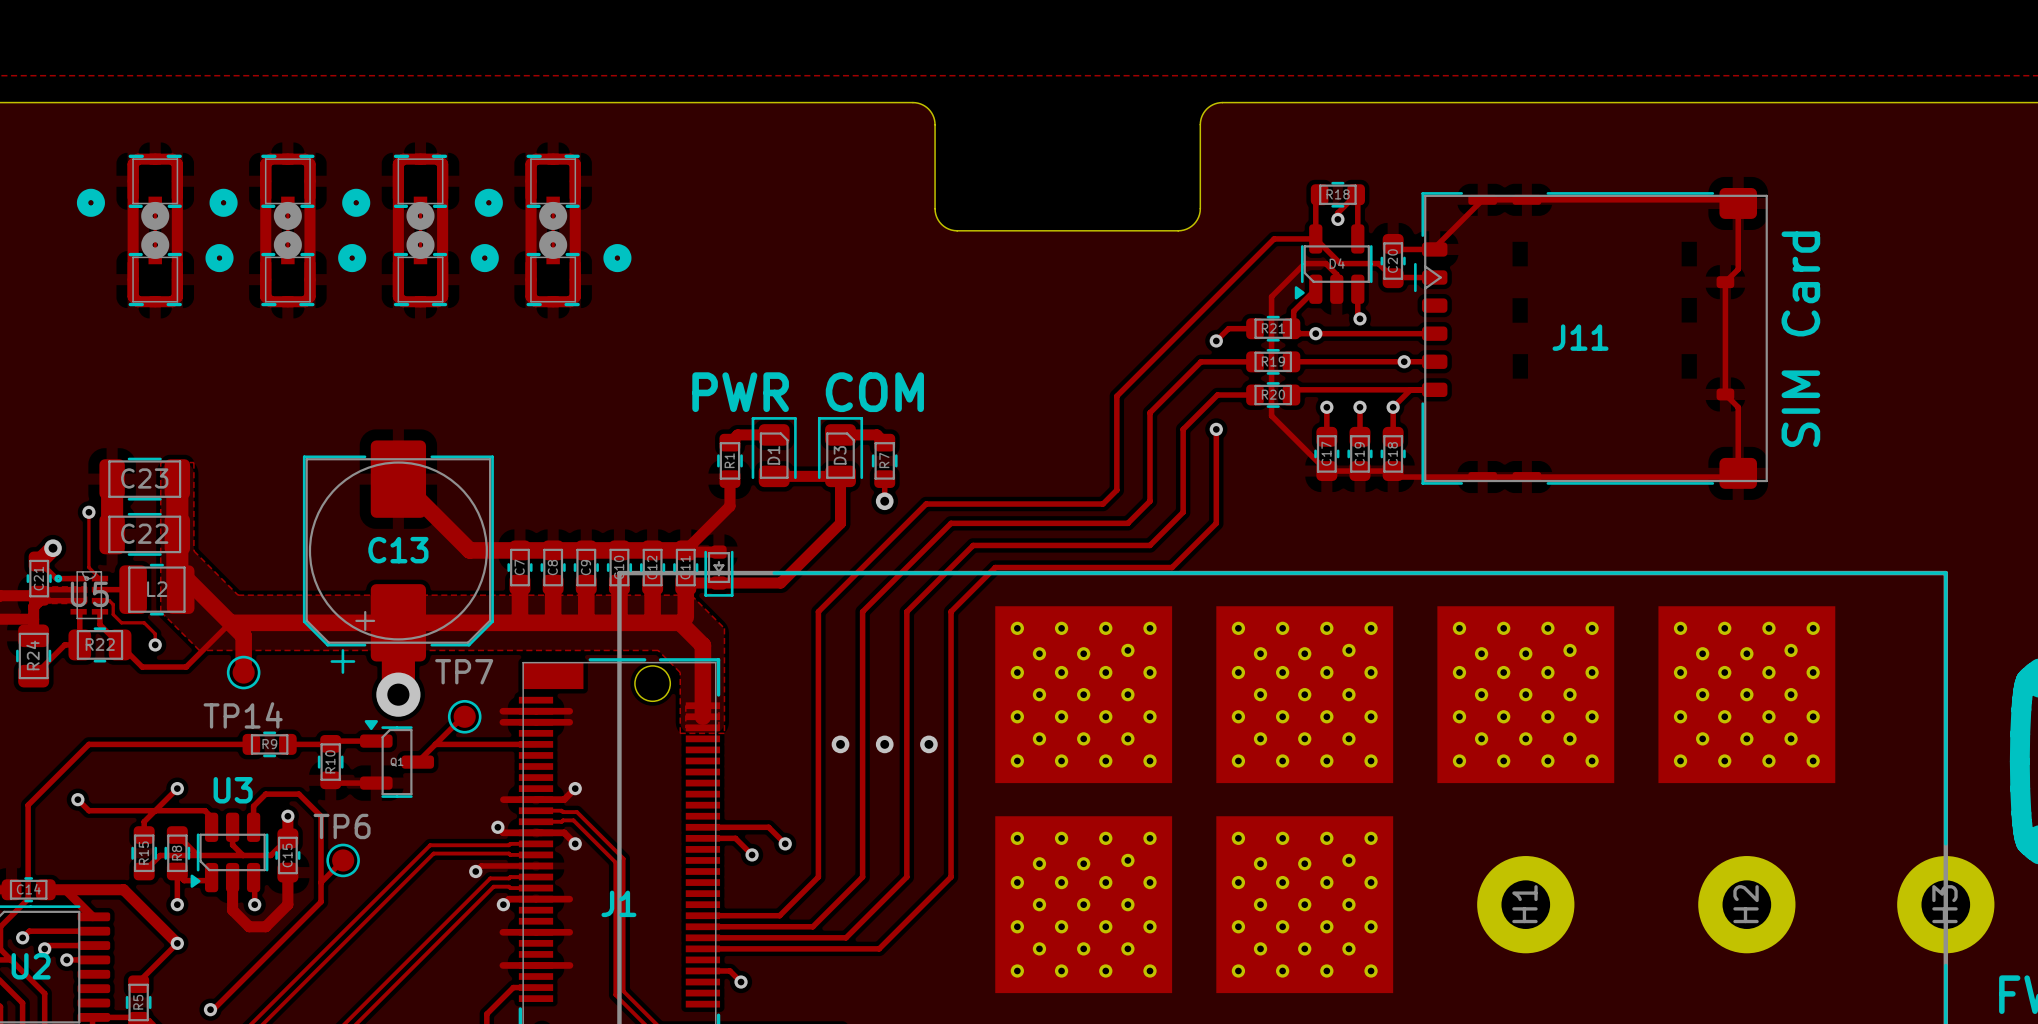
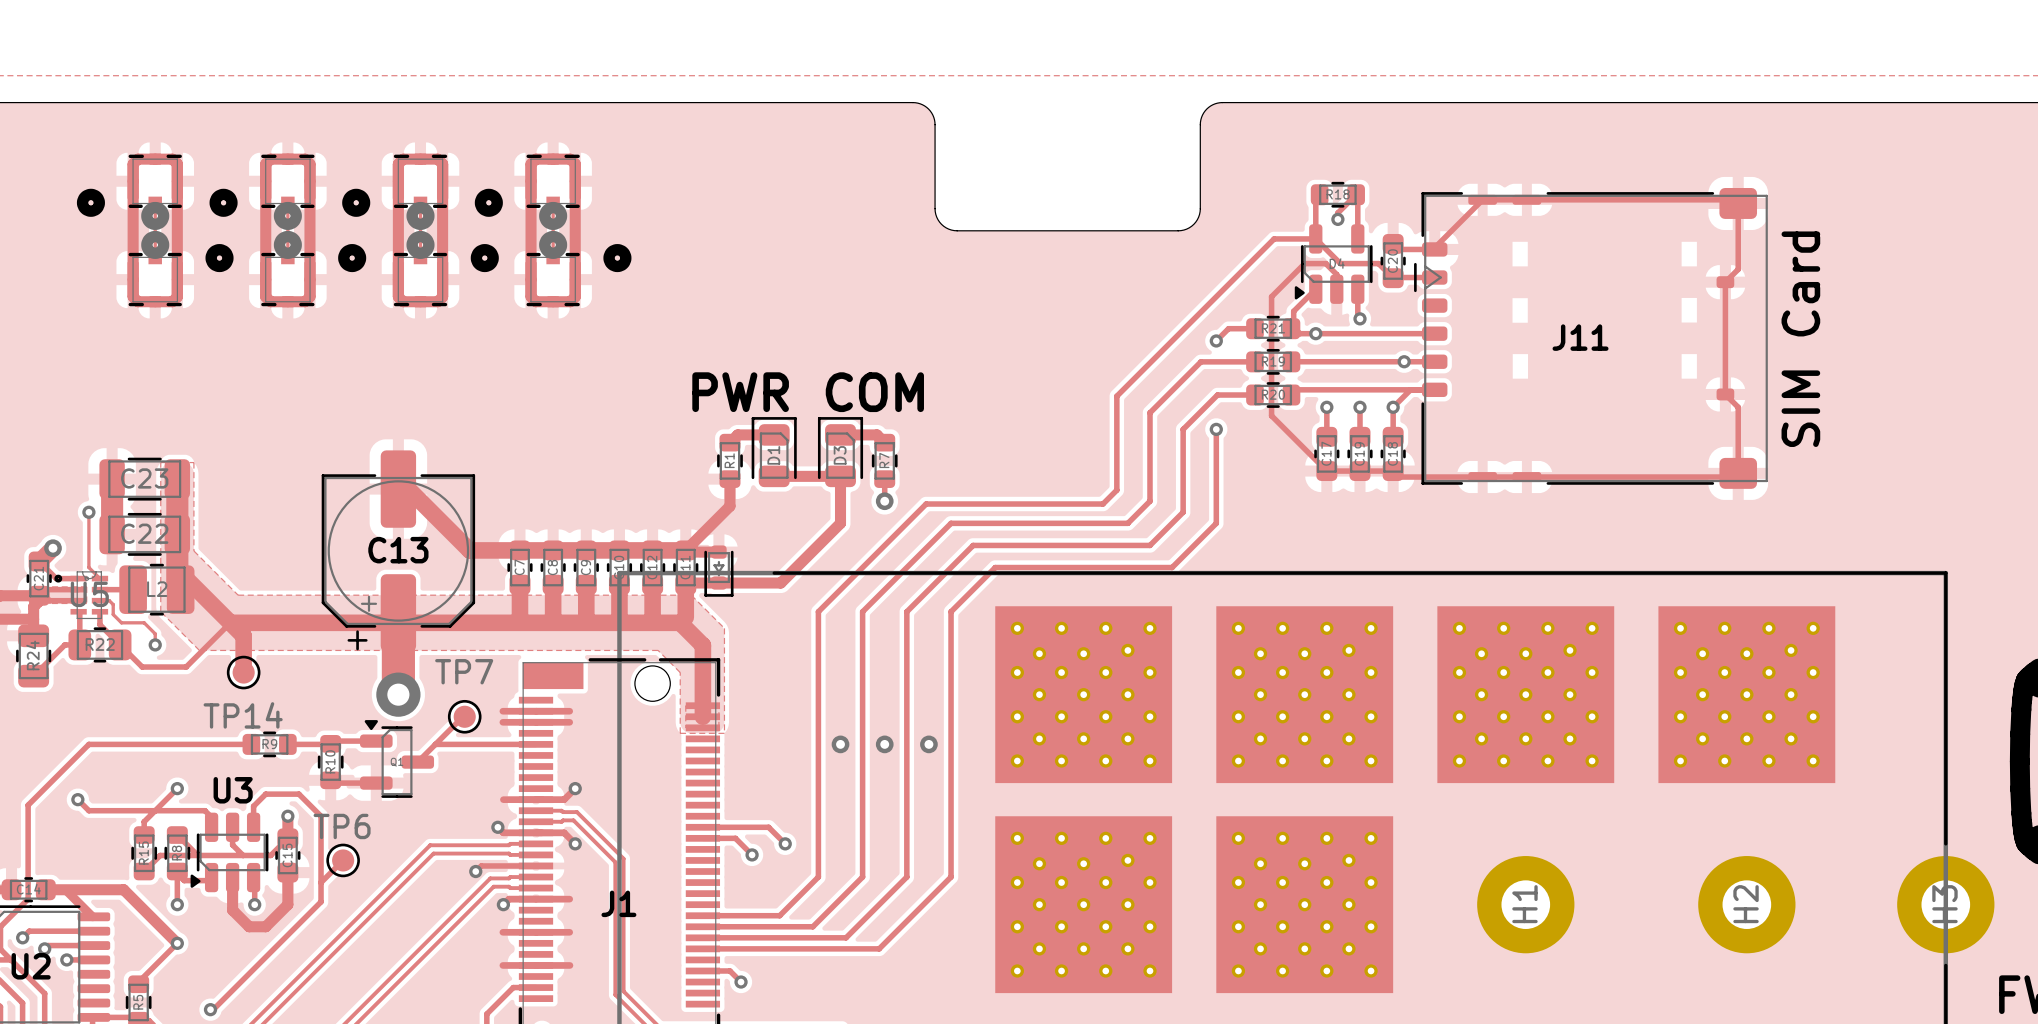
C13 footprint: [302, 440, 494, 674] -> [321, 450, 476, 652]

